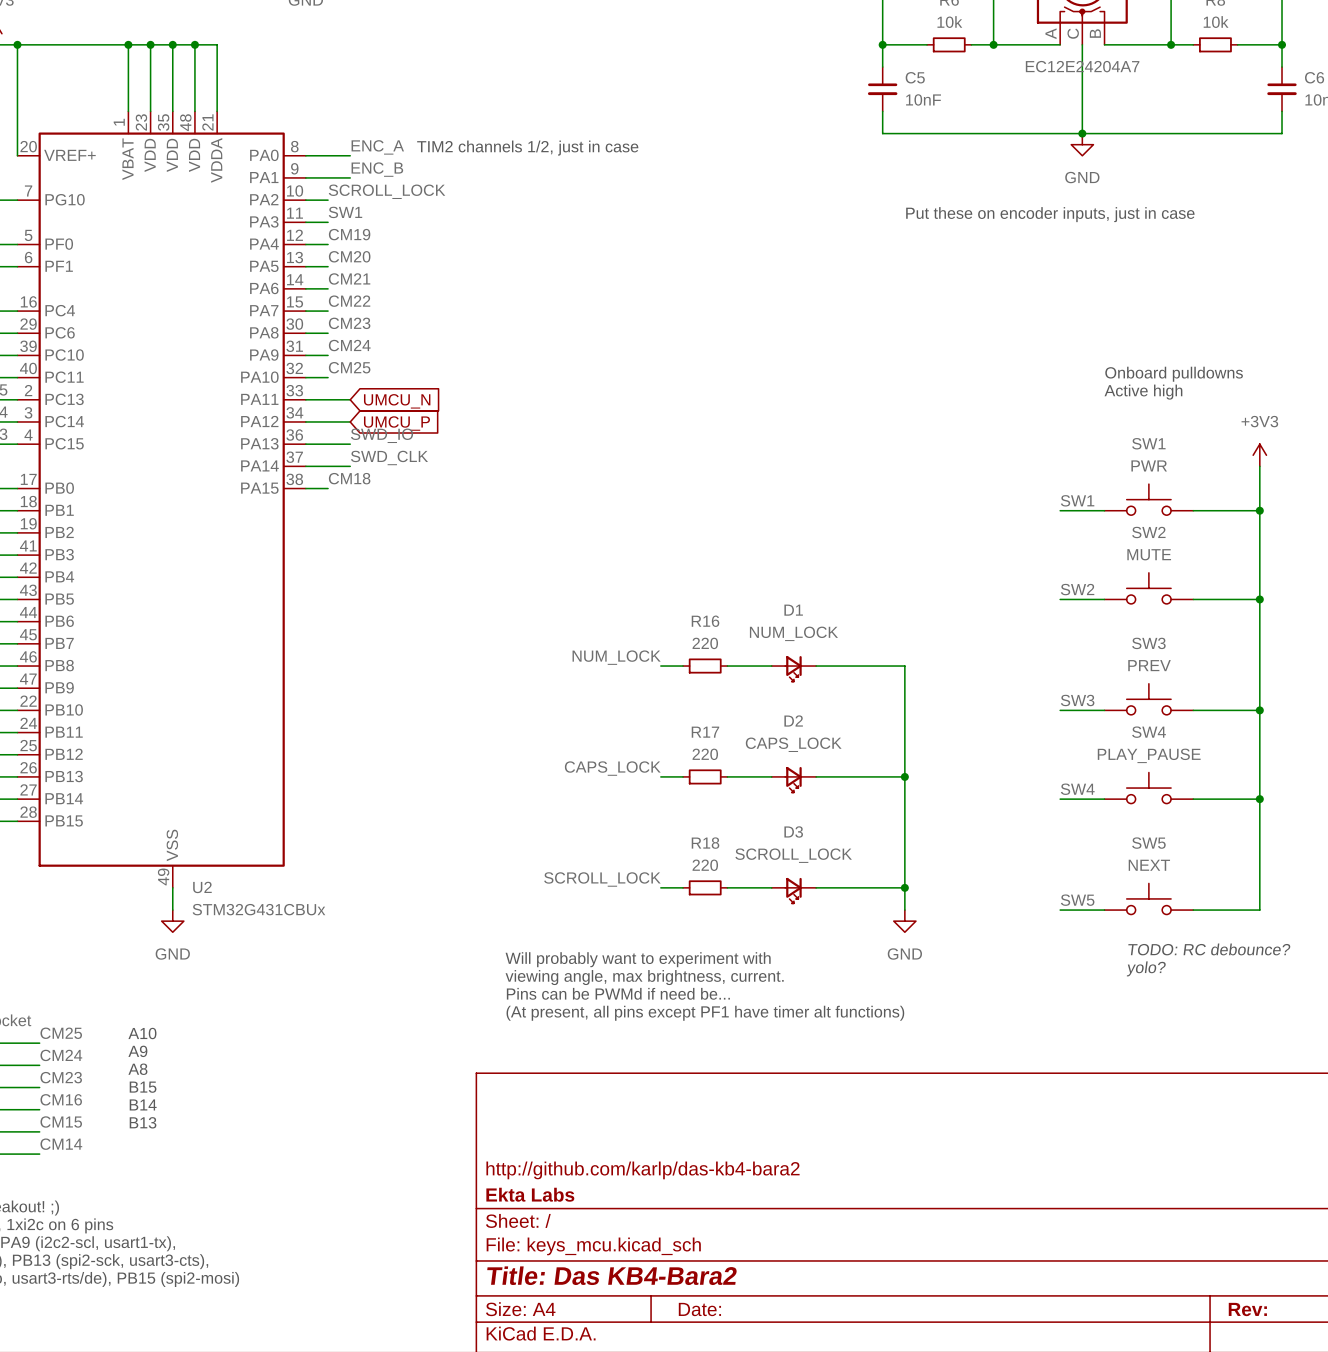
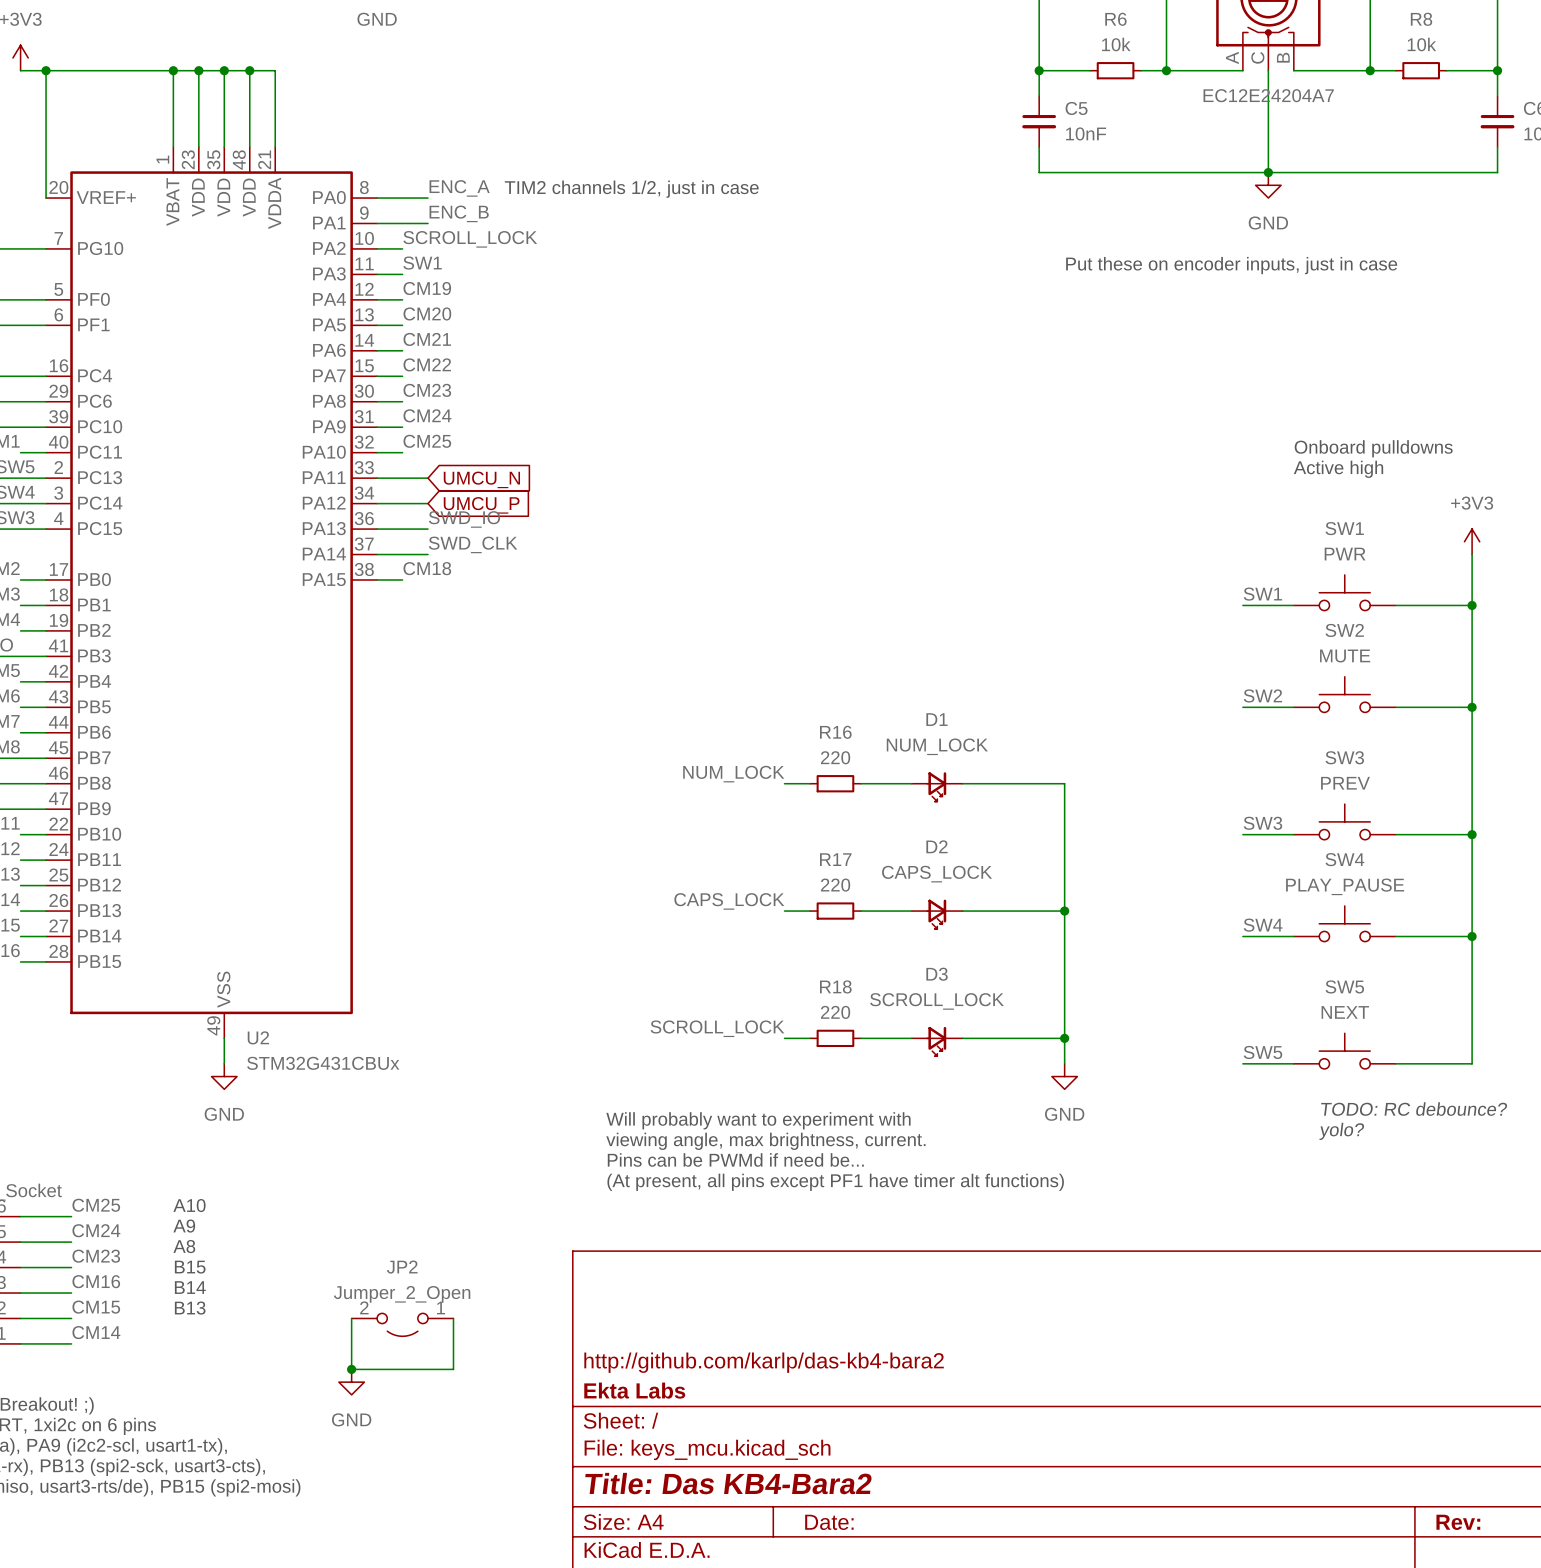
wire: none -> (351, 1318) (351, 1369) (453, 1369) (453, 1318)
JP2: none -> Jumper_2_Open (402, 1324)
junction: none -> (351, 1369)
power symbol: none -> GND (351, 1382)

